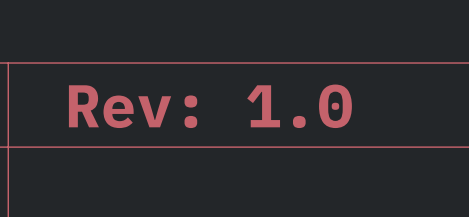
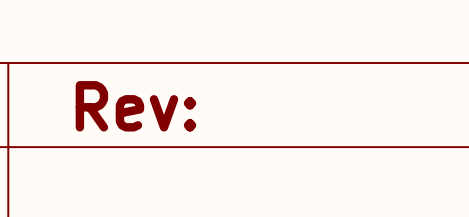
title block: Rev: 1.0 (210, 106) -> Rev: (135, 106)

